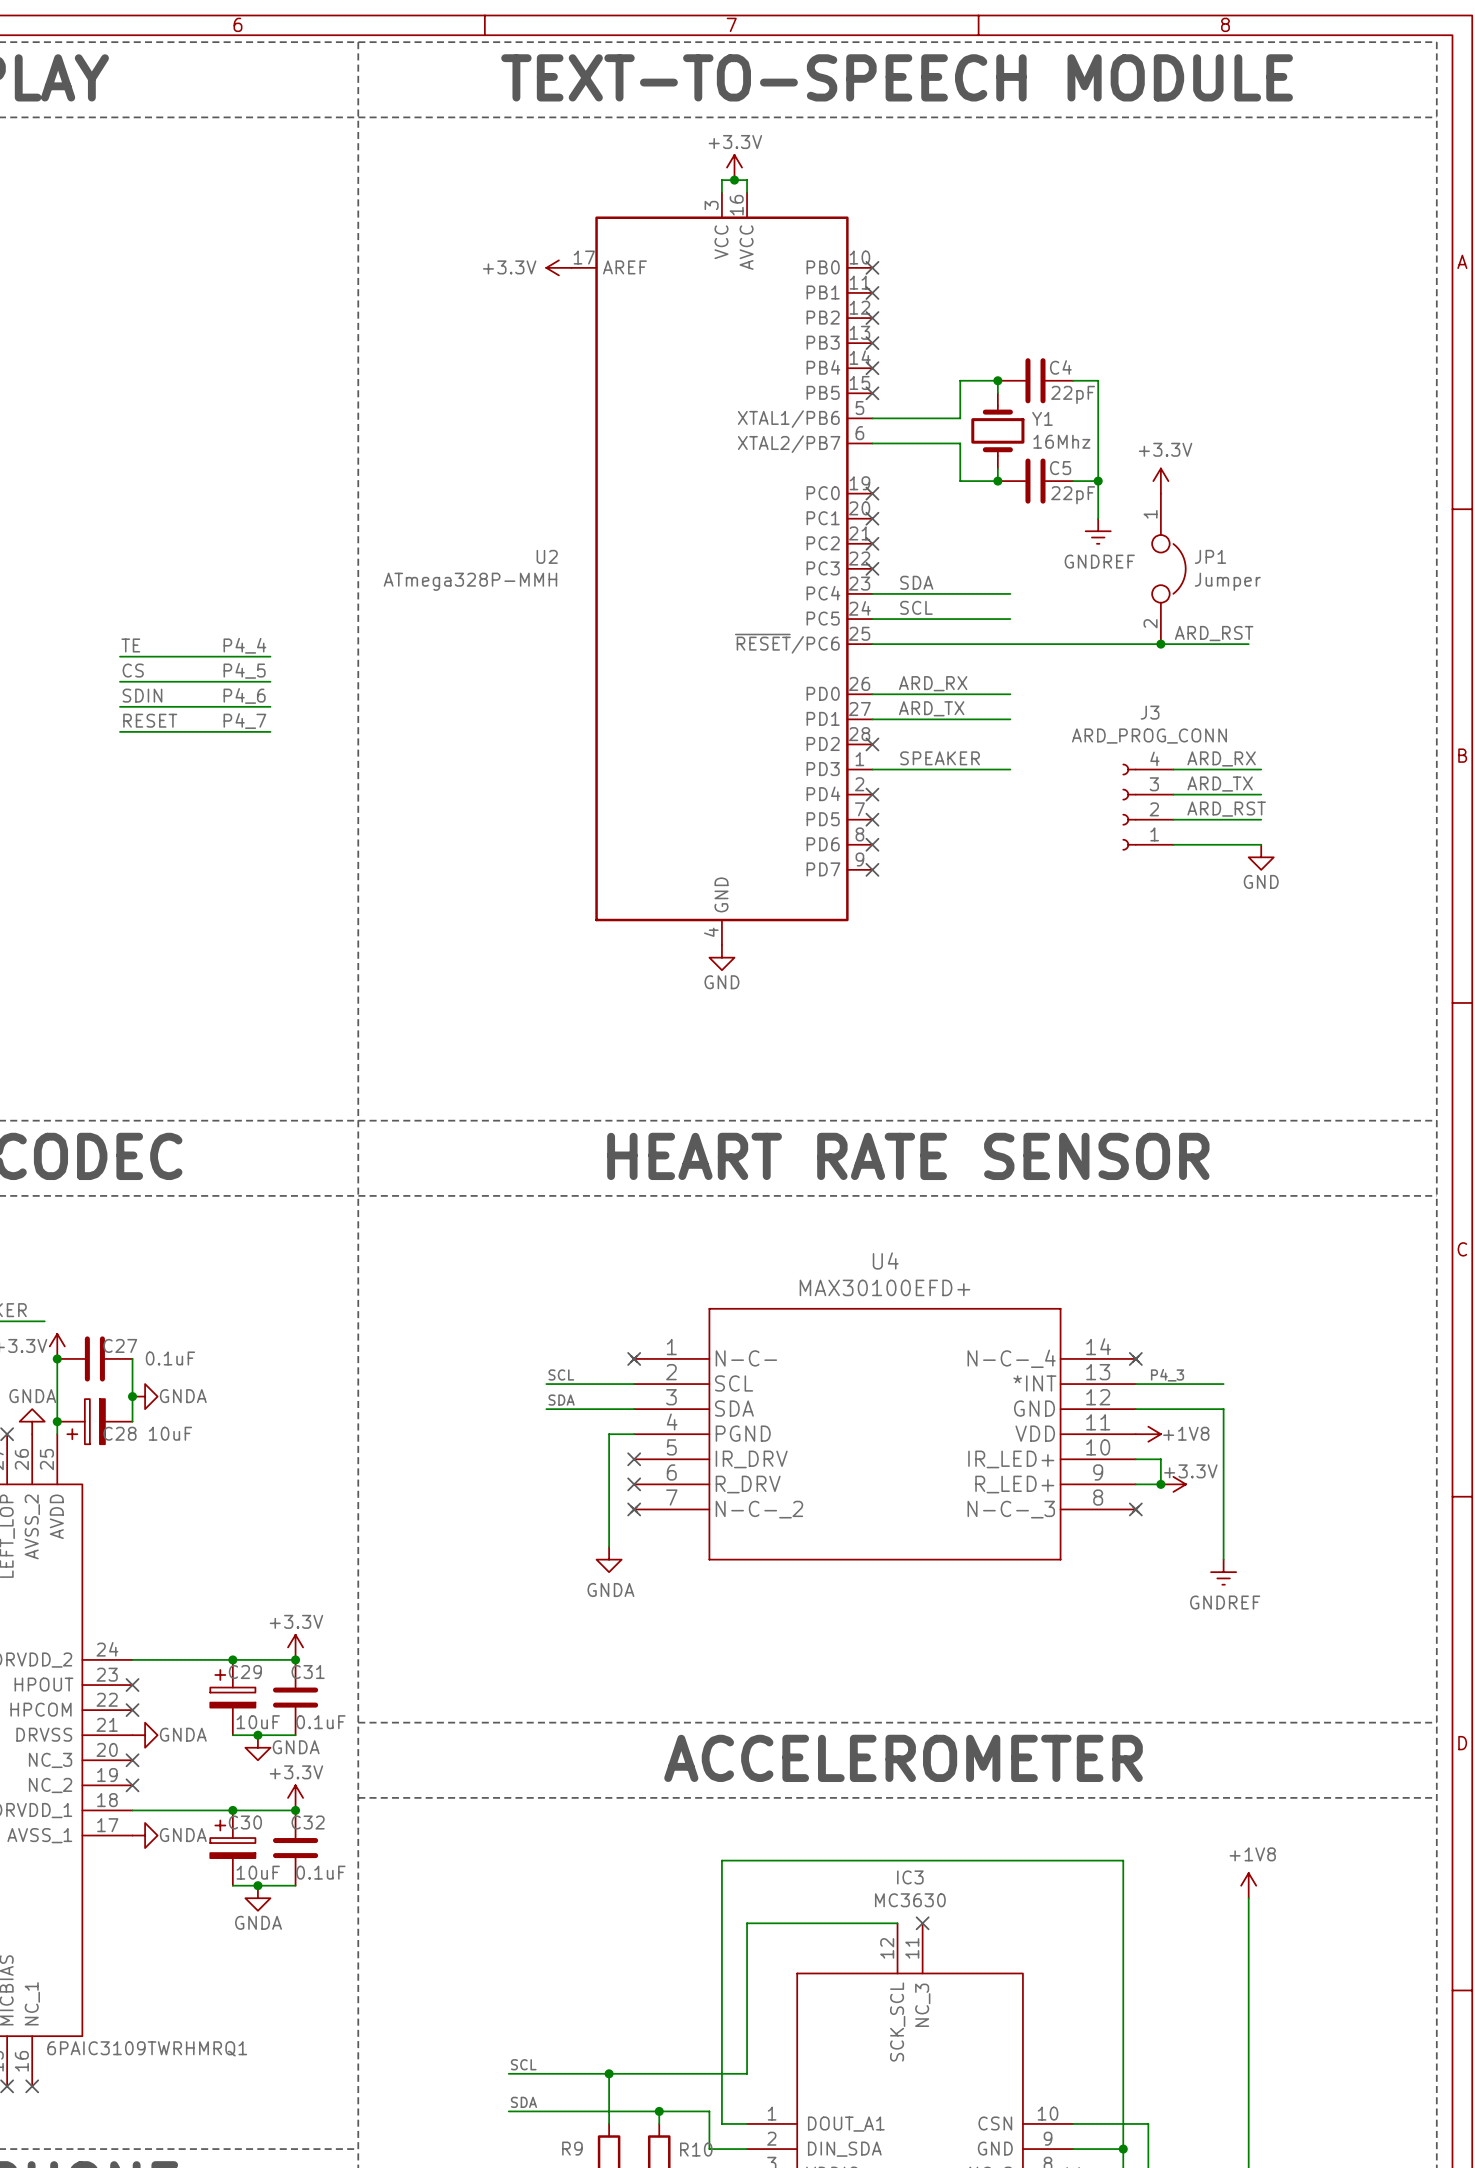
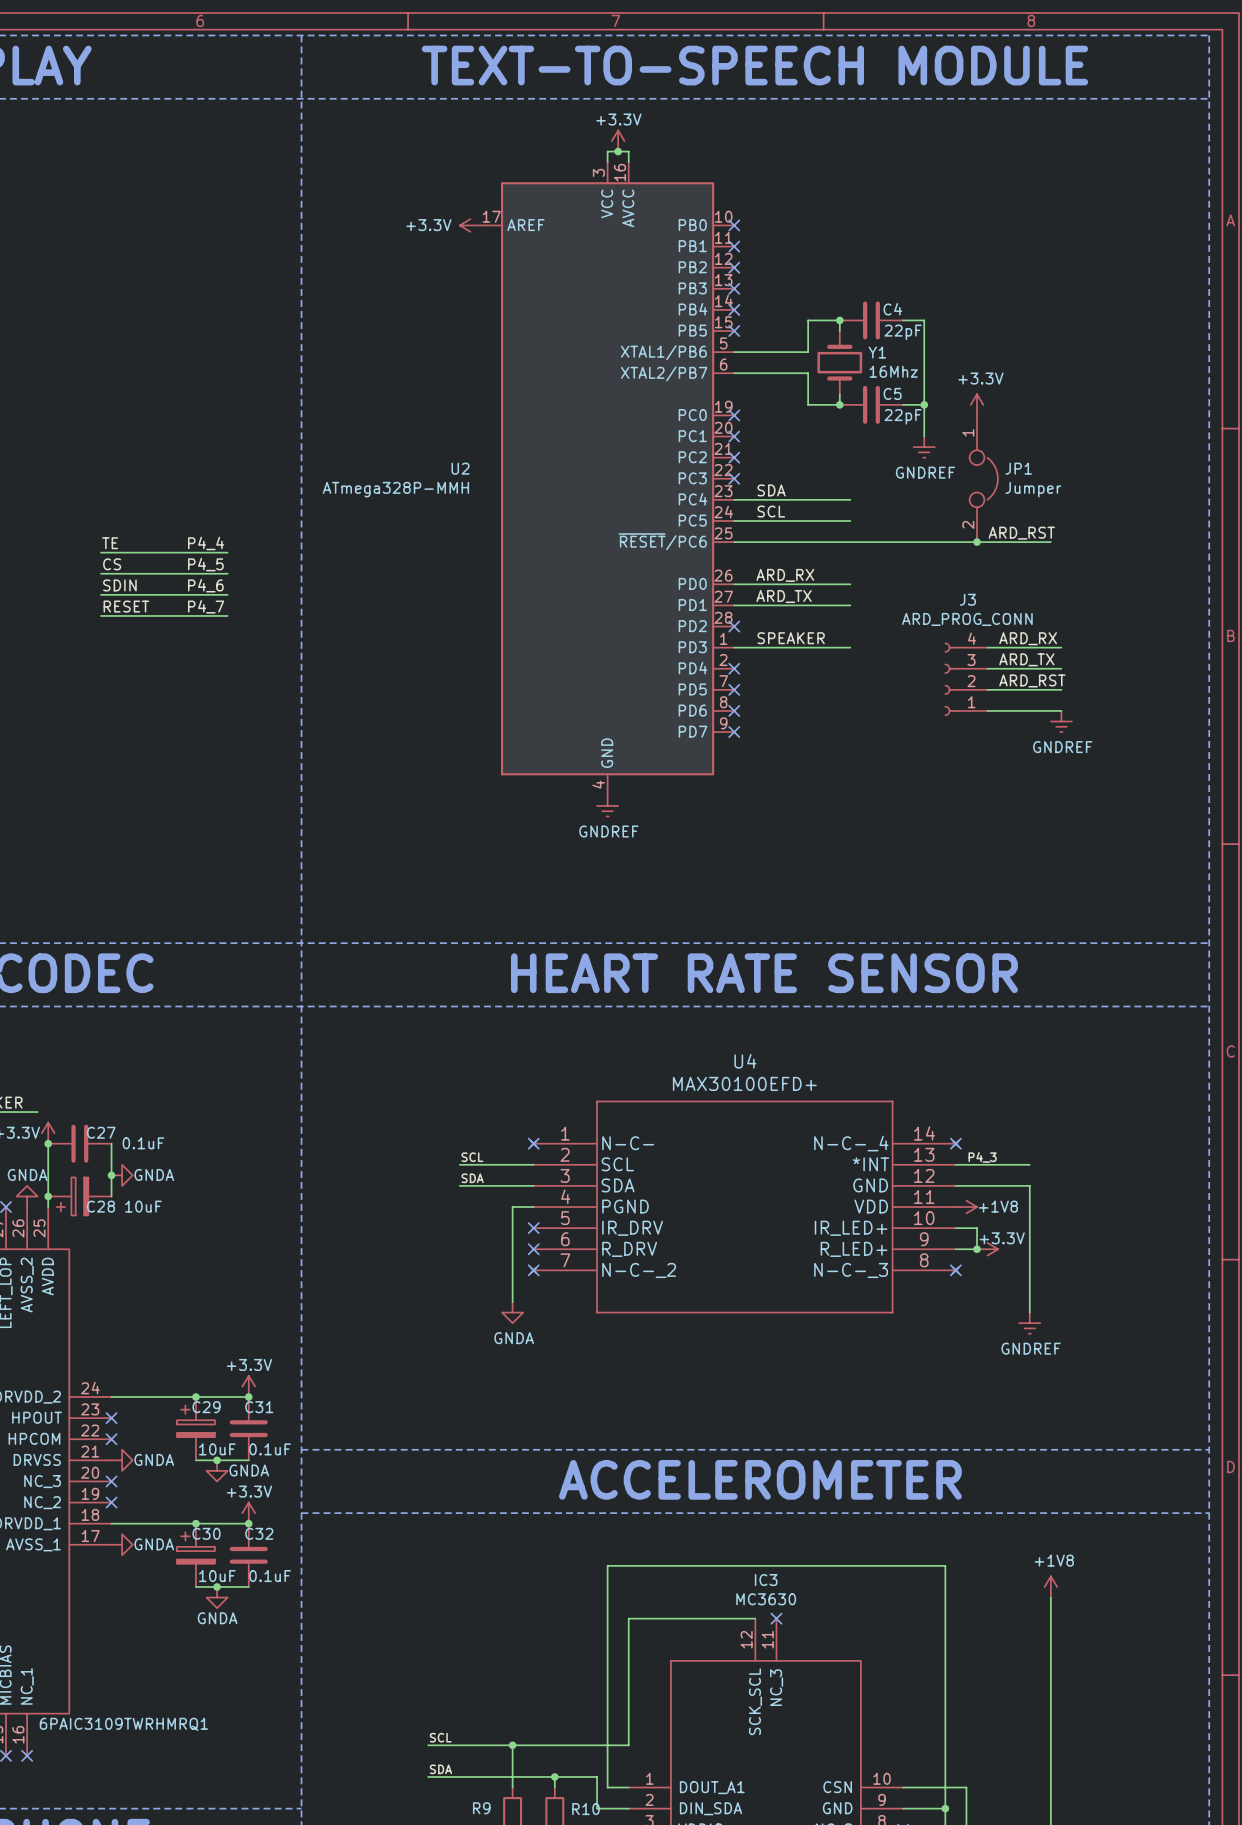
power symbol: GND (1261, 857) -> GNDREF (1061, 721)
power symbol: GND (721, 957) -> GNDREF (607, 805)

